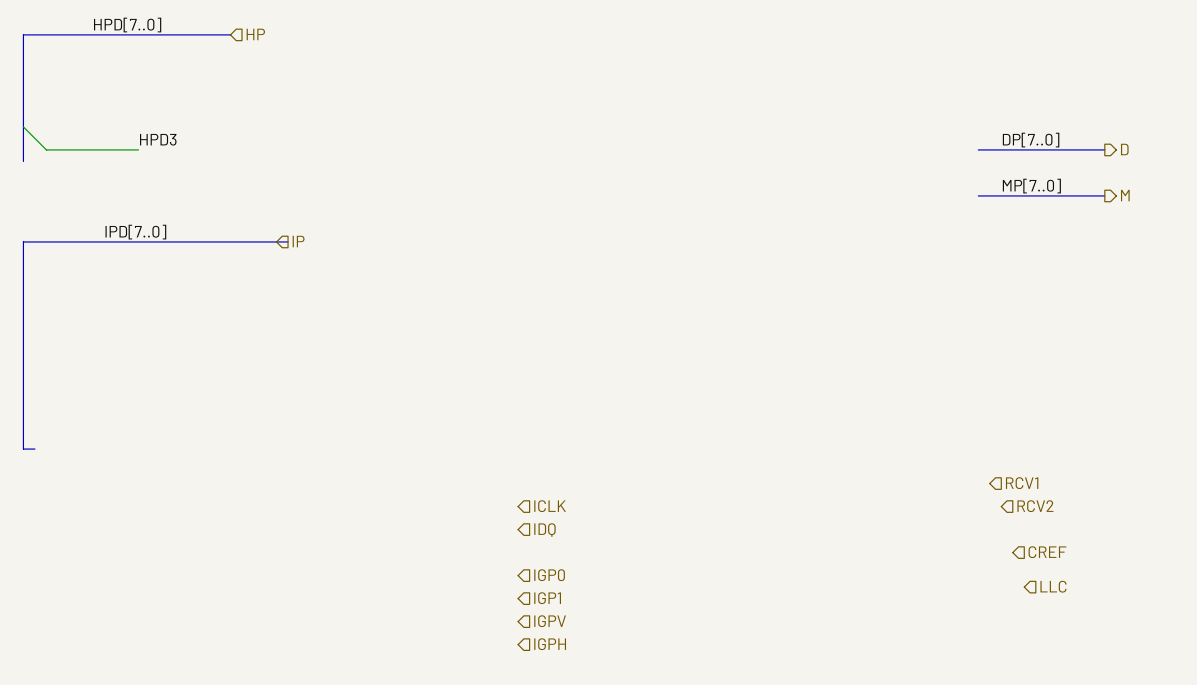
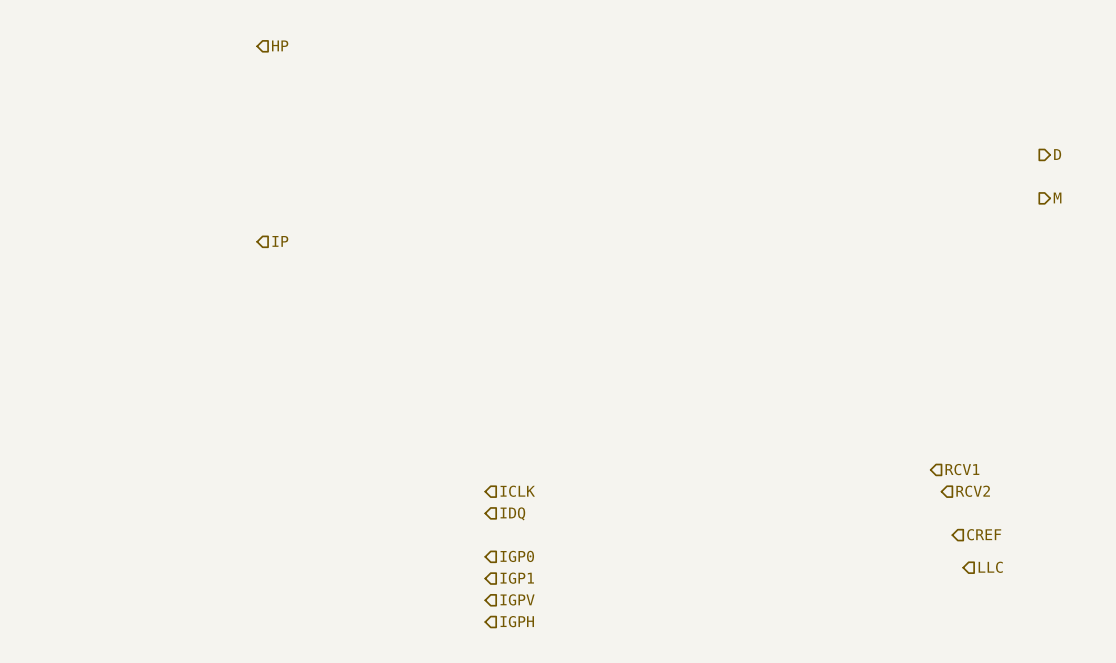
label: HPD[7..0] (127, 25) -> none
bus: (230, 34) (23, 34) (23, 161) -> none
hierarchical label position: HP (255, 34) -> HP (280, 45)
wire: (23, 126) (46, 149) (138, 149) -> none
label: HPD3 (158, 139) -> none
label: DP[7..0] (1031, 140) -> none
bus: (978, 149) (1104, 149) -> none
label: MP[7..0] (1031, 186) -> none
bus: (978, 195) (1104, 195) -> none
label: IPD[7..0] (135, 232) -> none
bus: (288, 241) (23, 241) (23, 449) (34, 449) -> none

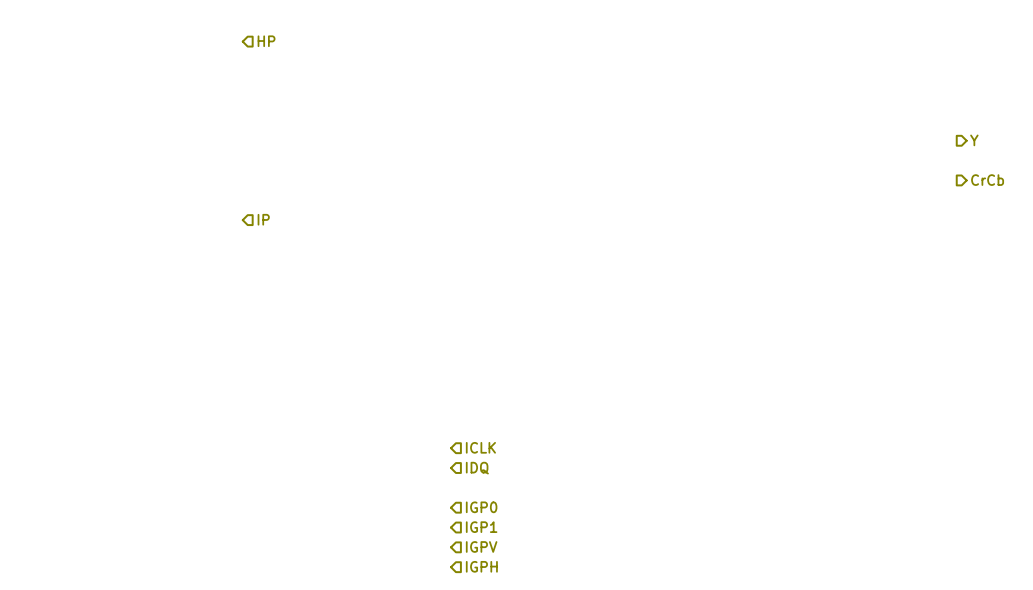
hierarchical label: D (1057, 154) -> Y (974, 140)
hierarchical label: M (1057, 197) -> CrCb (987, 180)
hierarchical label: RCV1 (962, 469) -> none
hierarchical label: RCV2 (973, 491) -> none
hierarchical label: CREF (984, 534) -> none
hierarchical label: LLC (990, 567) -> none

